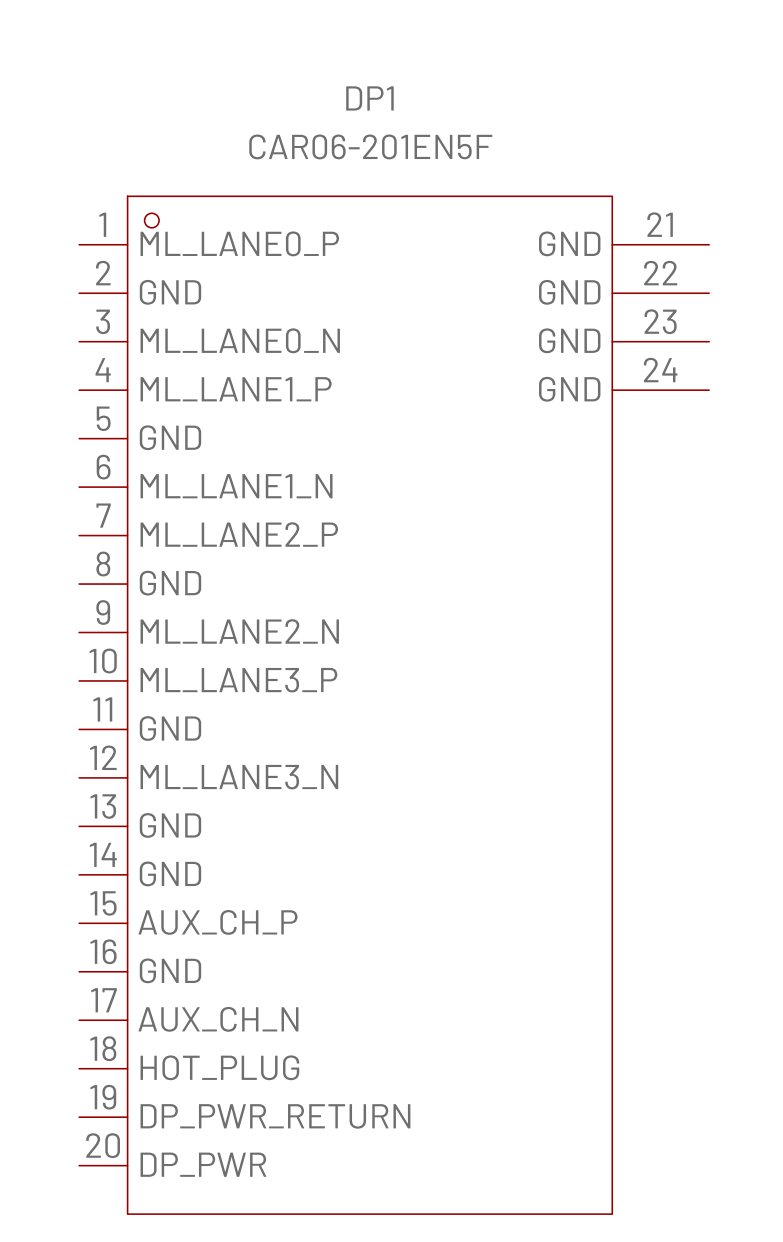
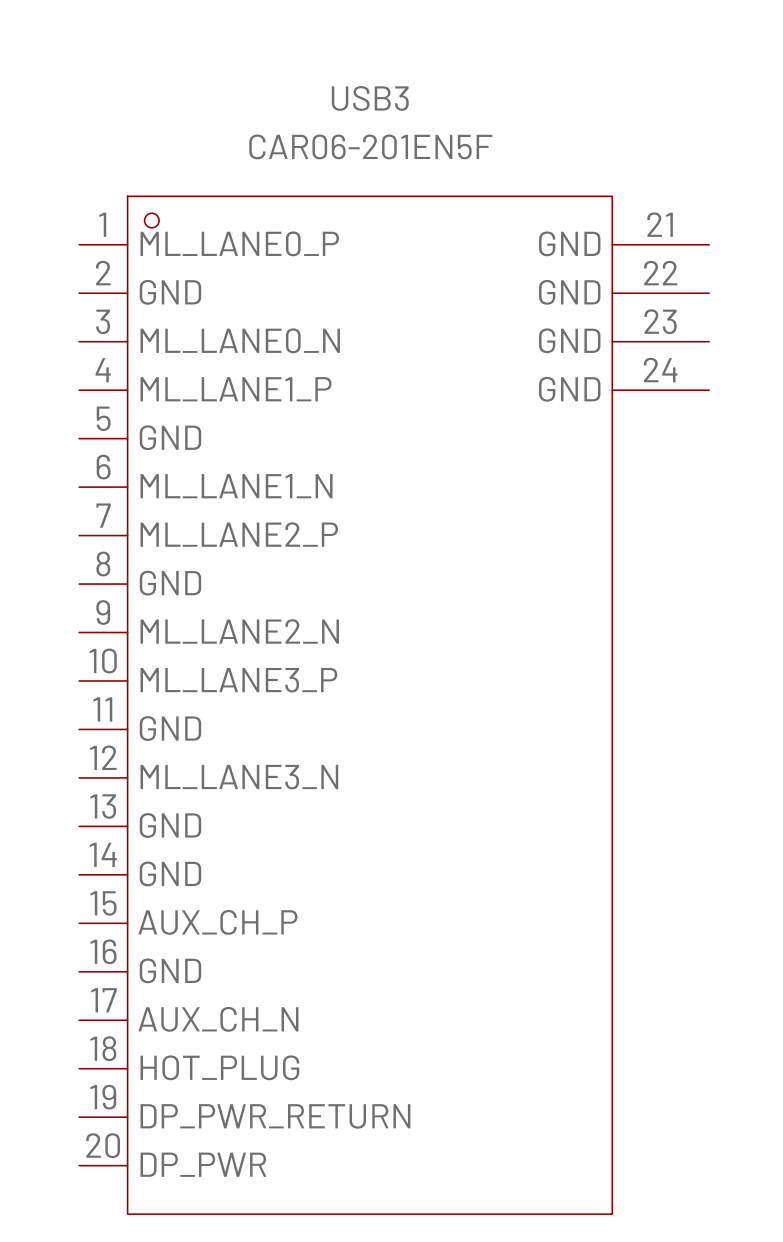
DP1 name: DP1 (369, 98) -> USB3 (370, 98)

